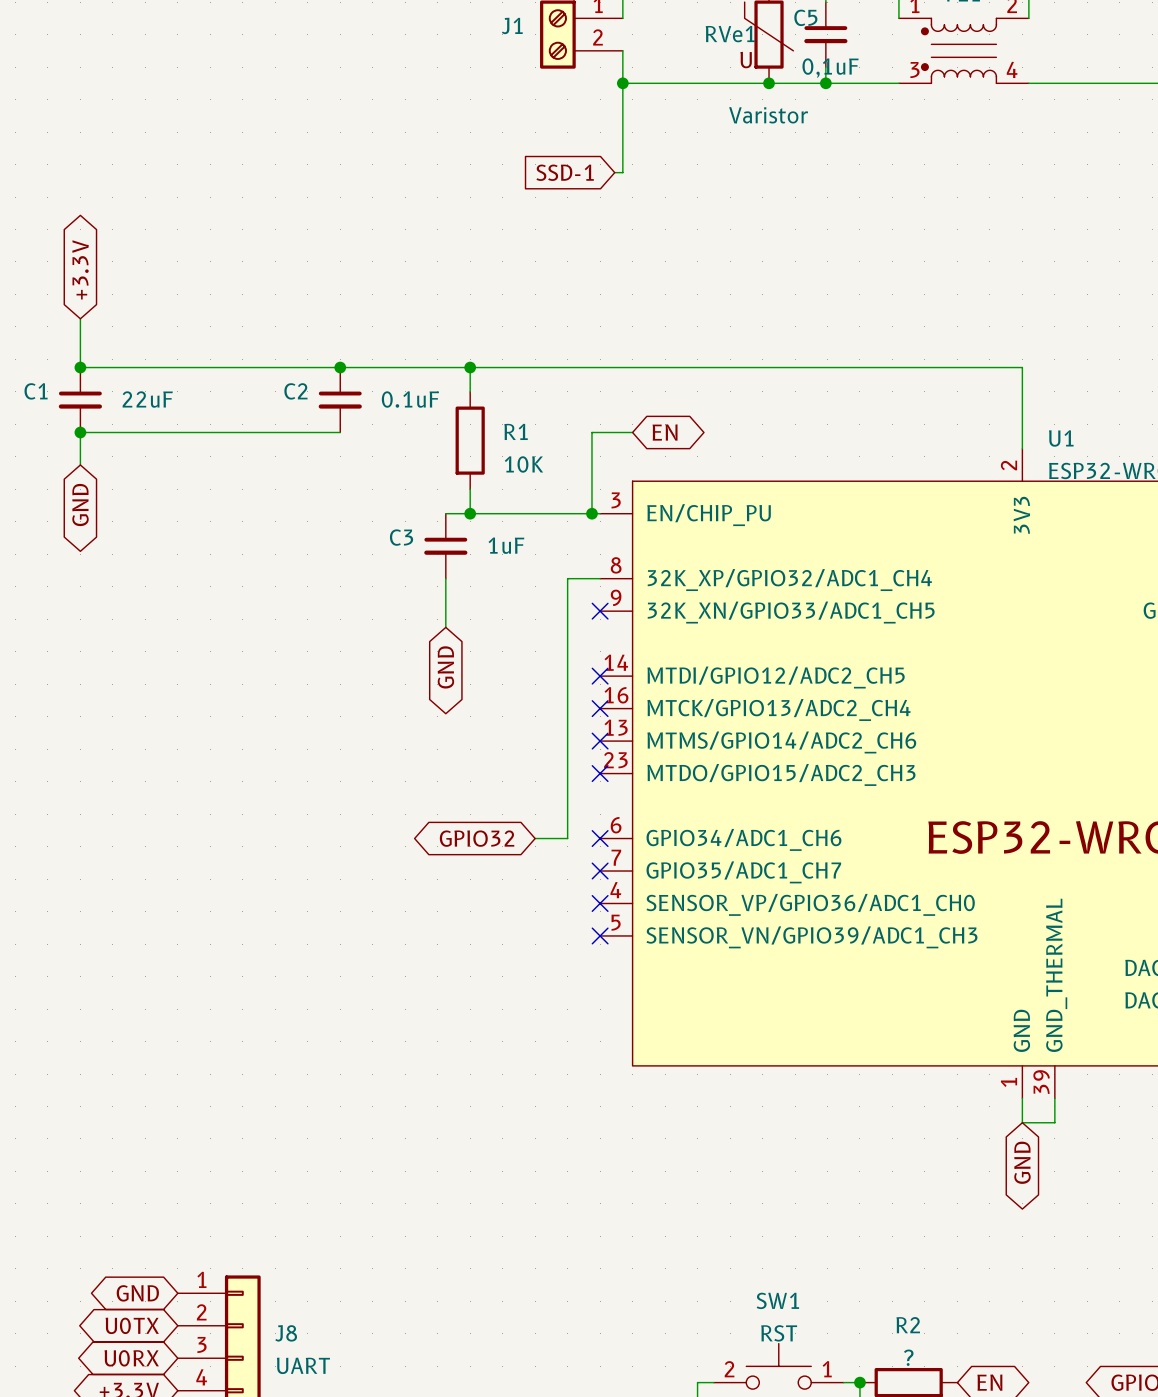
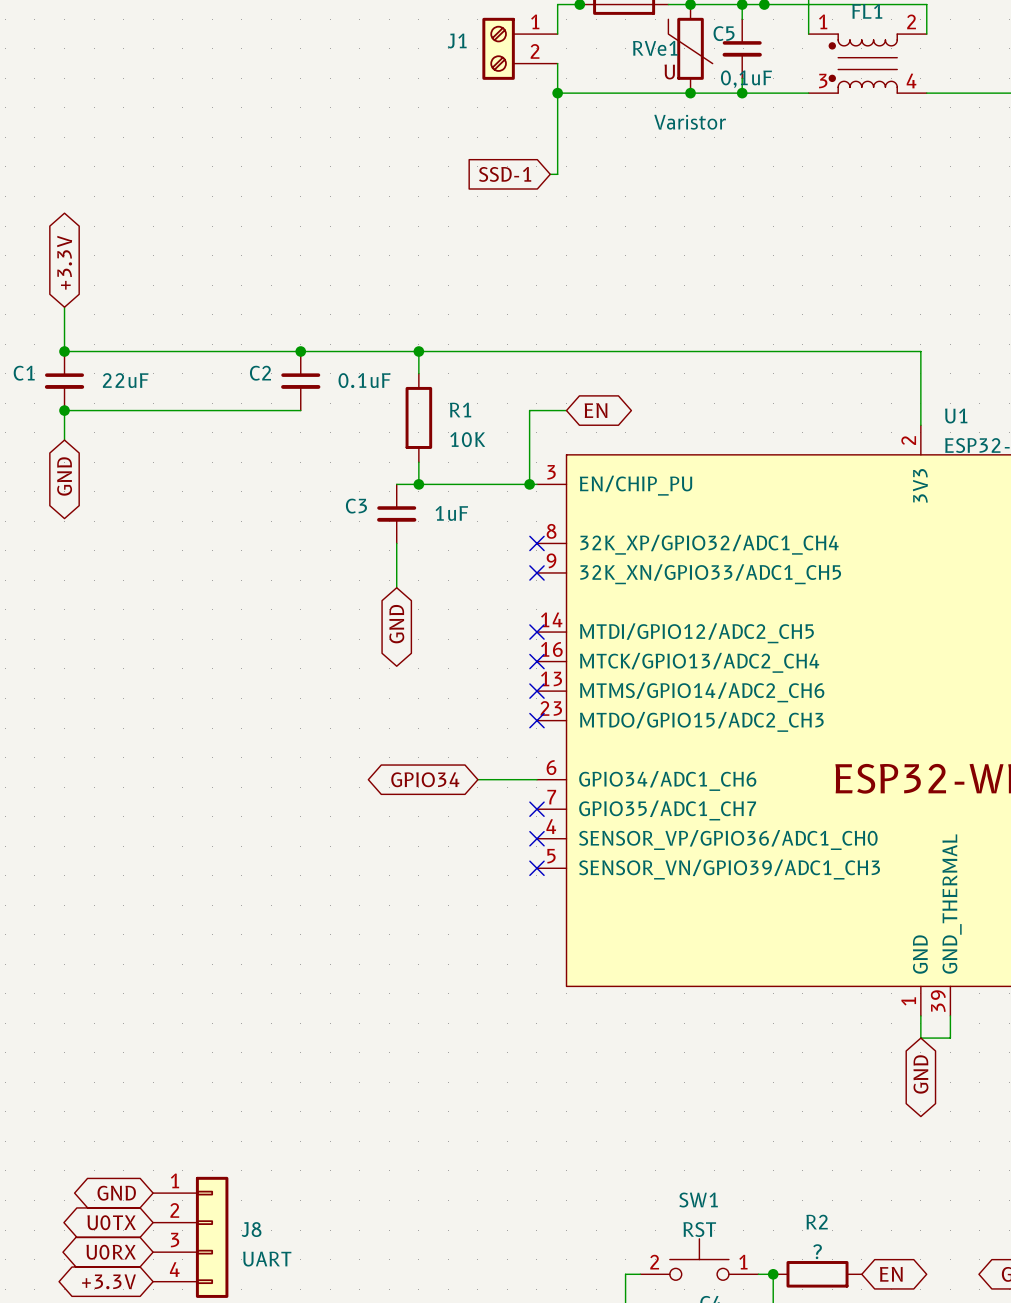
wire: (600, 578) (567, 578) (567, 838) -> (536, 779) (507, 779)
no-connect mark: none -> (536, 543)
global label: GPIO32 (477, 838) -> GPIO34 (425, 779)
no-connect mark: (600, 838) -> none

